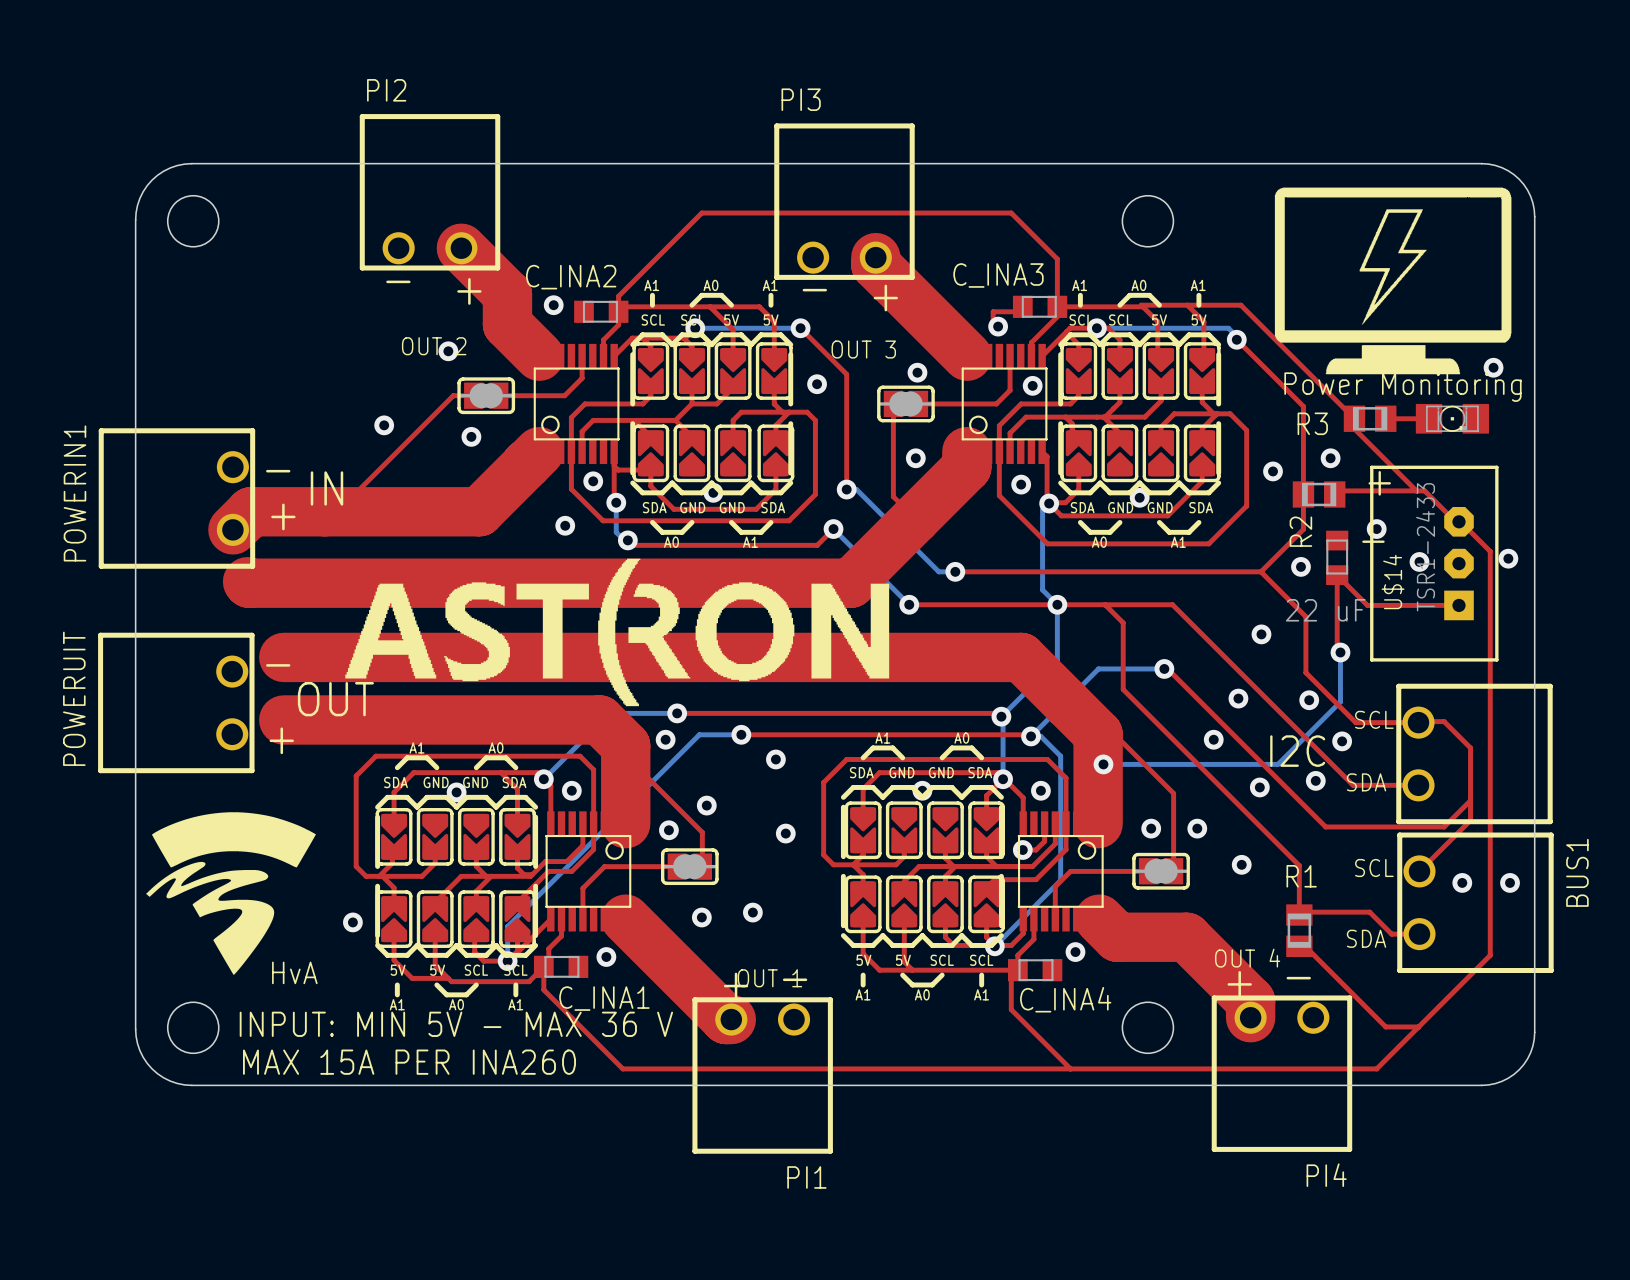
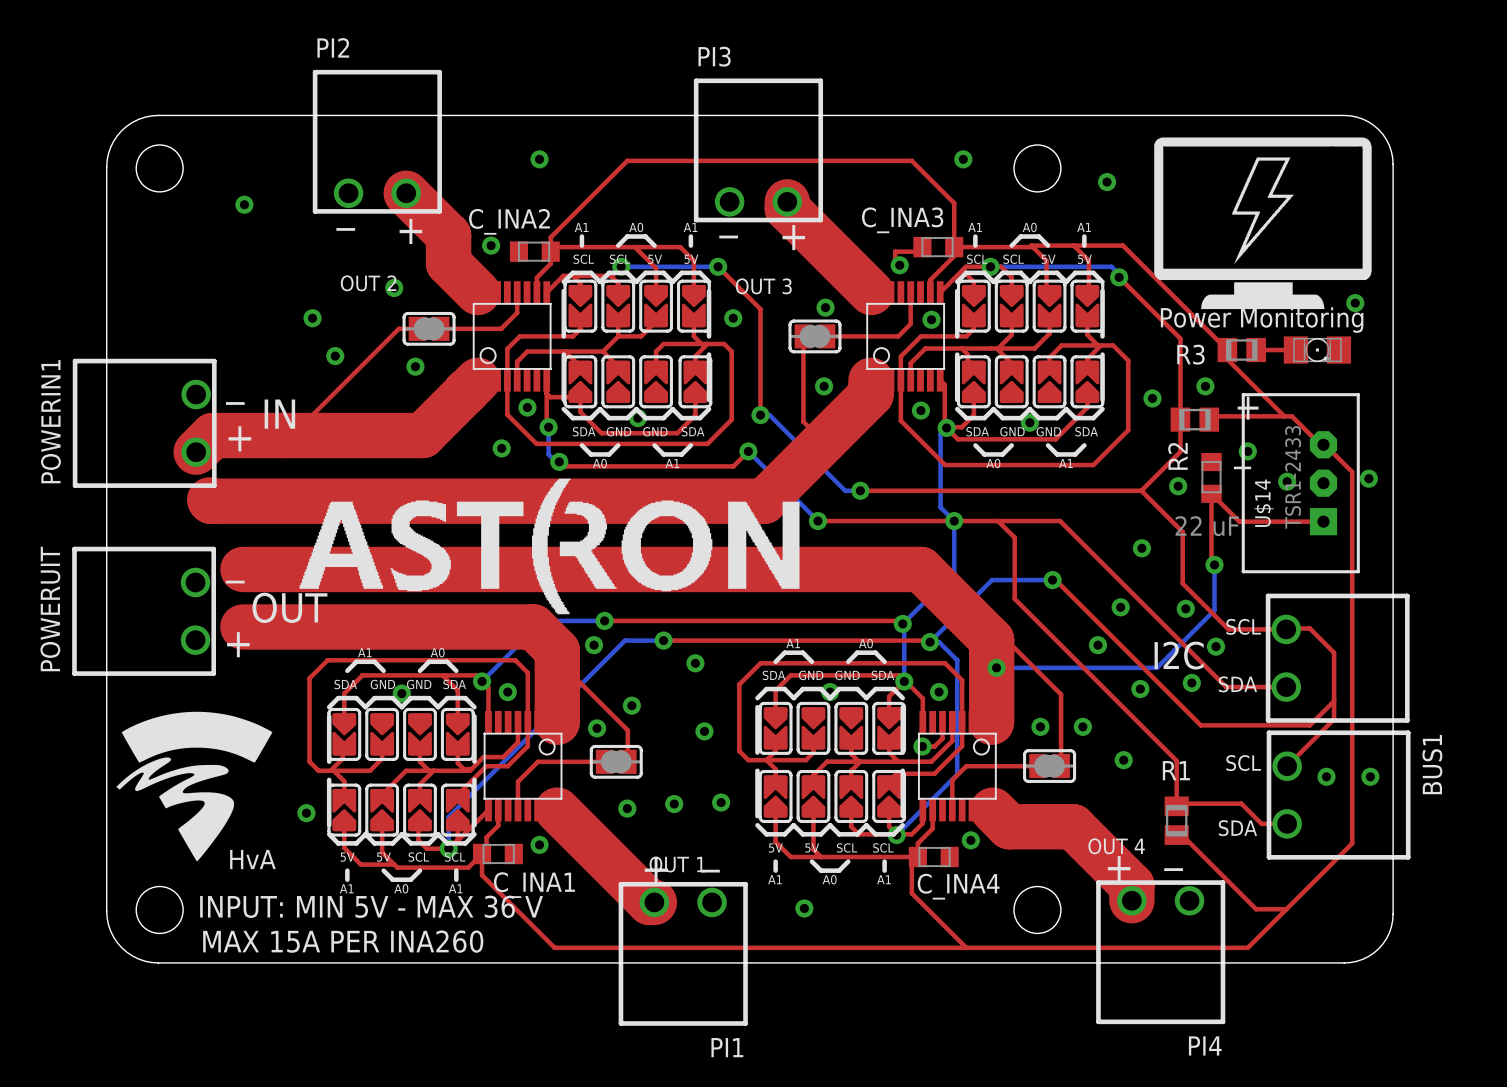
via: none -> (539, 159)
via: none -> (963, 159)
via: none -> (1107, 182)
via: none -> (244, 204)
via: none -> (312, 318)
via: none -> (721, 802)
via: none -> (804, 908)

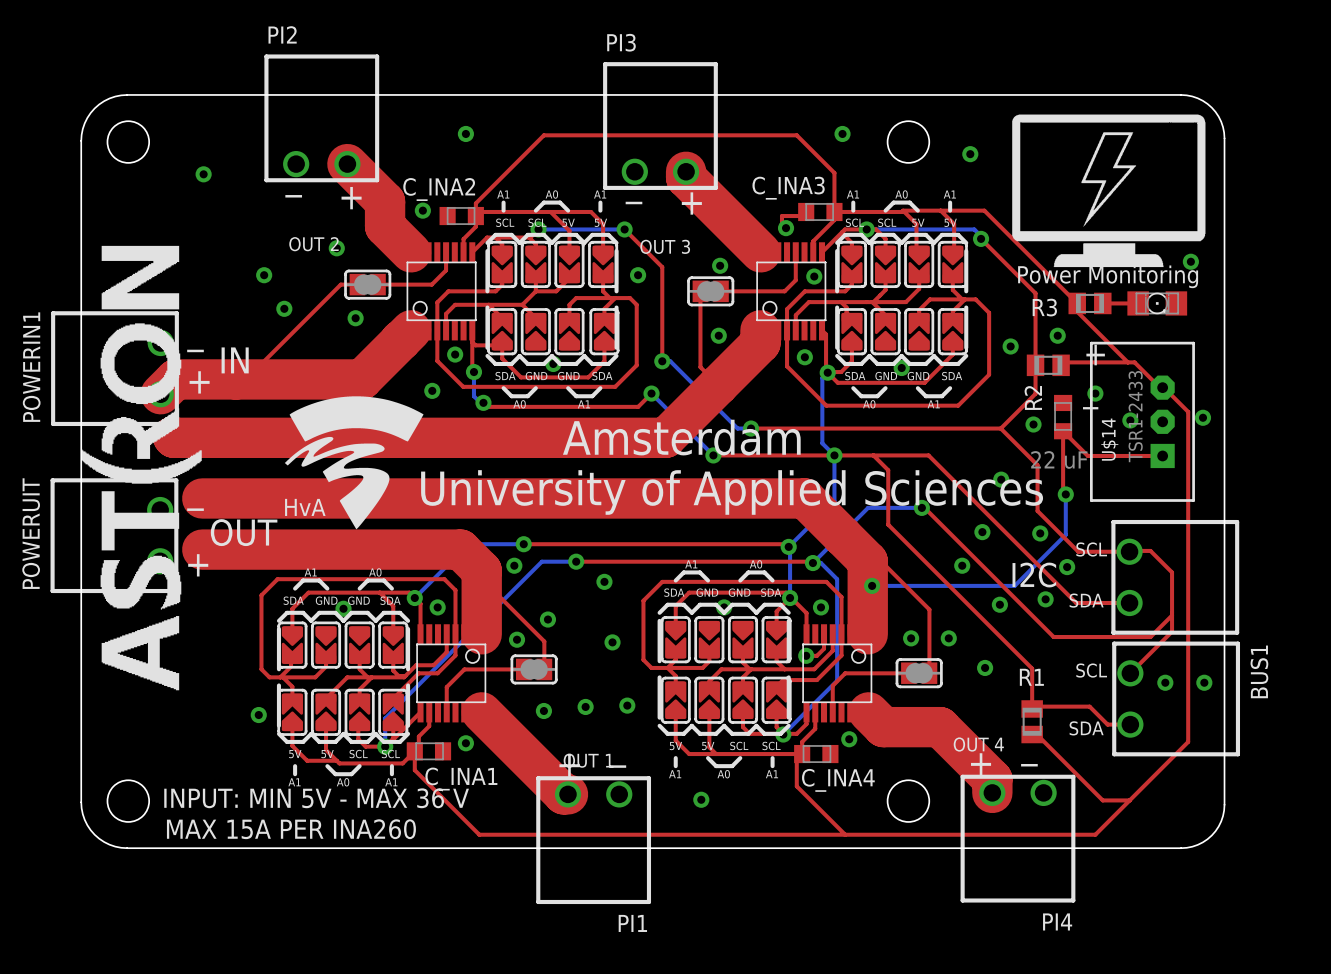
drawing: none -> [81, 245, 202, 691]
drawing: [299, 478, 800, 615] -> none
text: none -> Amsterdam (681, 437)
text: none -> University of Applied Sciences (732, 492)
drawing position: (194, 786) -> (354, 462)
text position: HvA (252, 859) -> HvA (305, 507)

